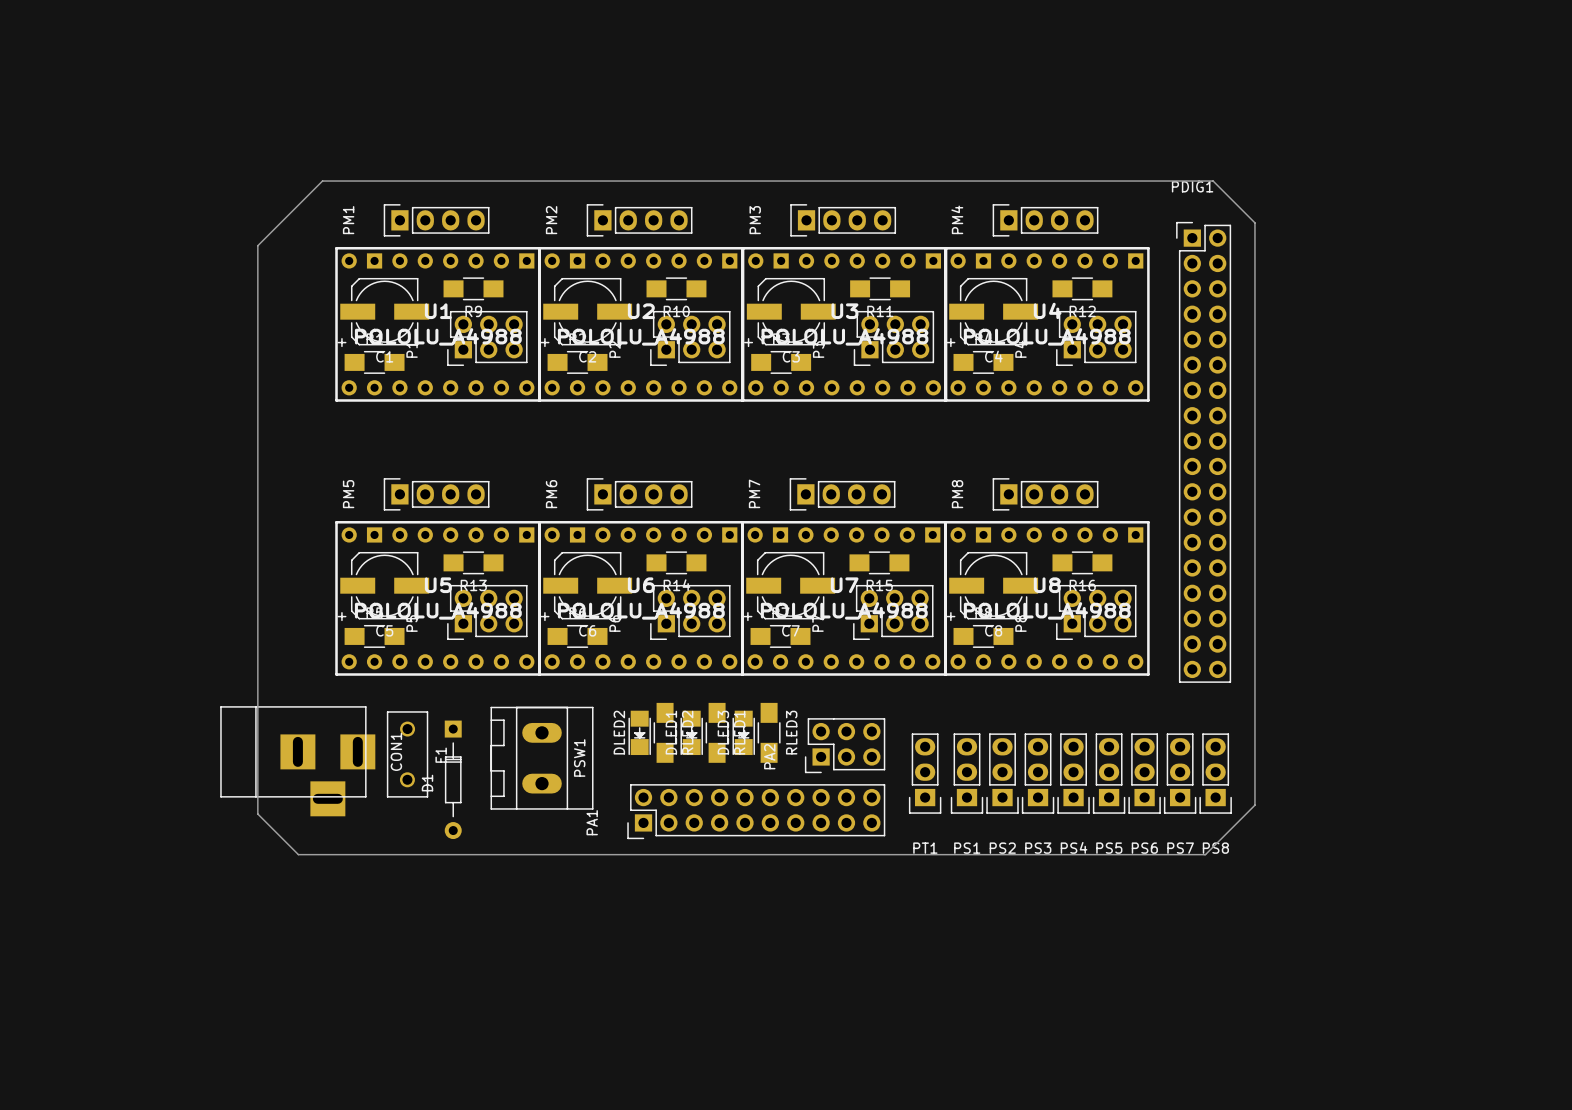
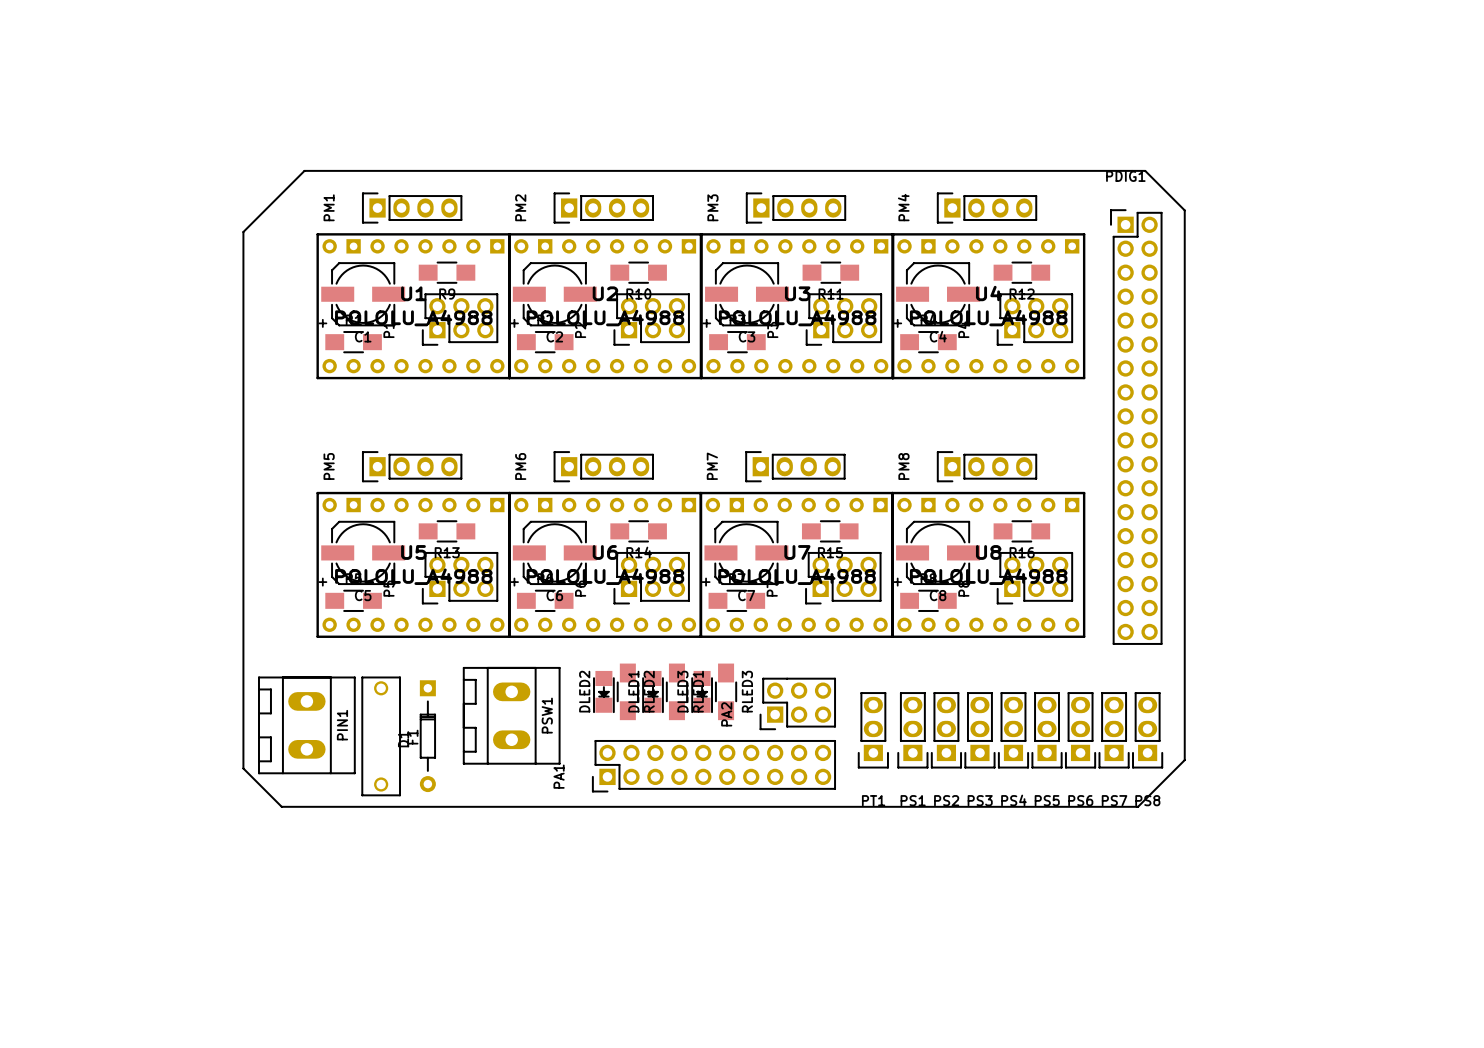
F1 footprint: [386, 711, 429, 798] -> [361, 676, 401, 797]
CON1: (297, 761) -> none
PIN1: none -> (306, 725)

